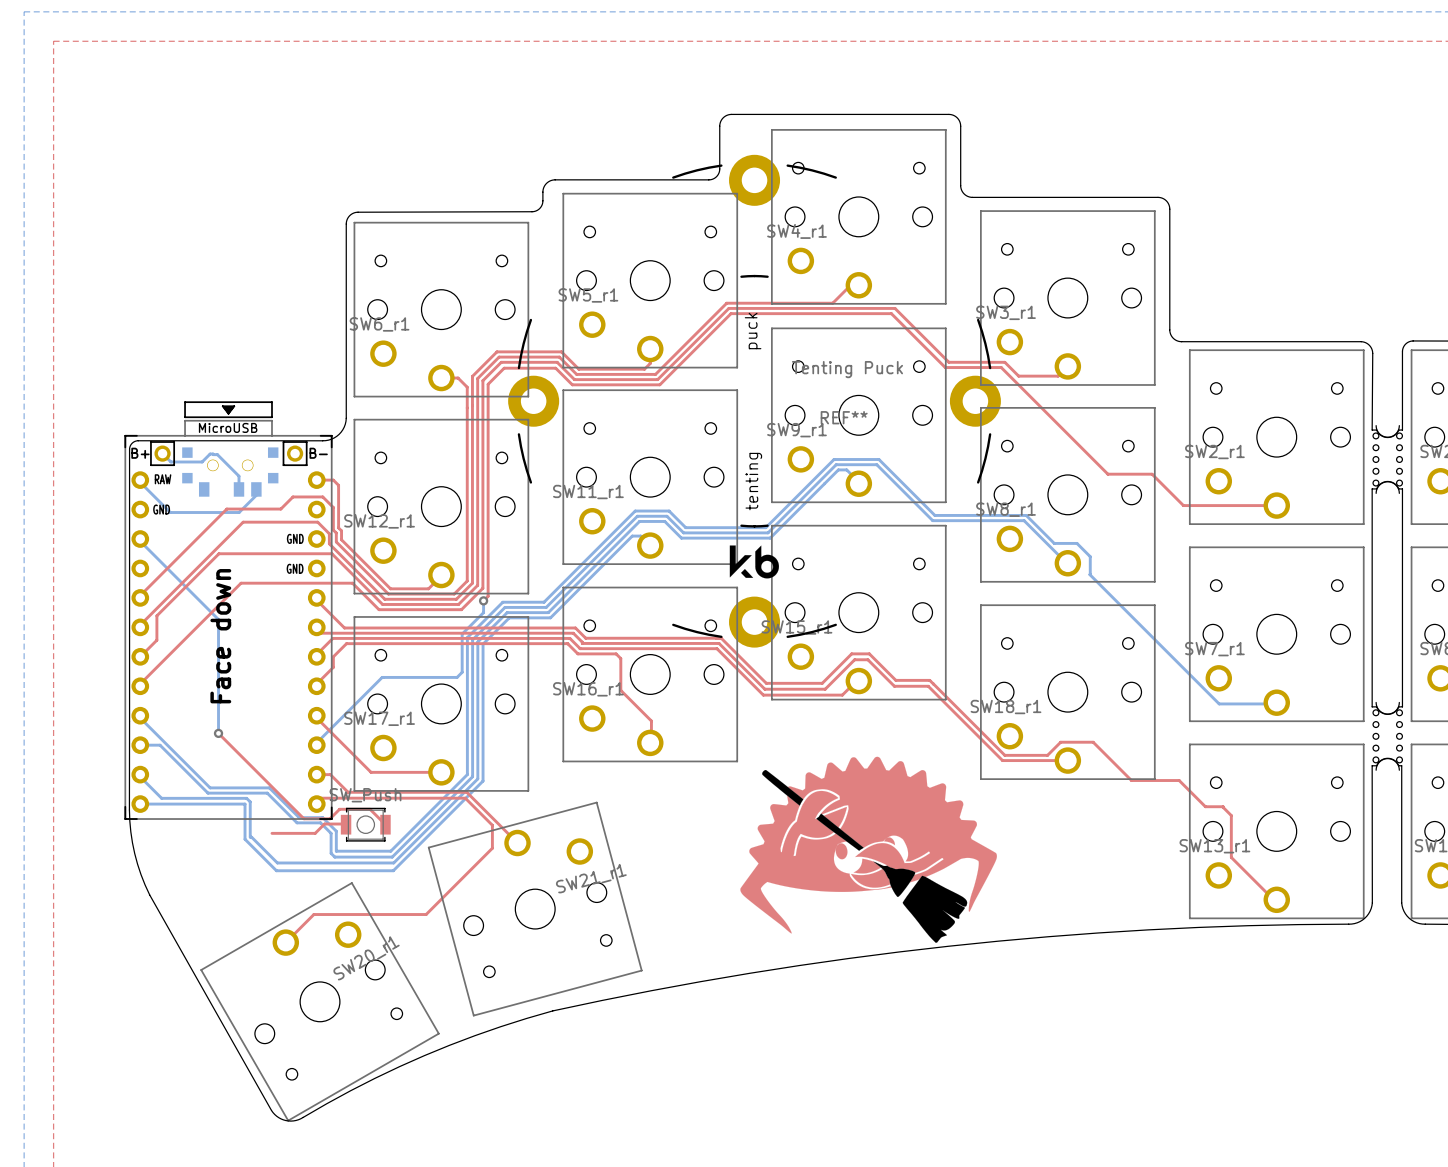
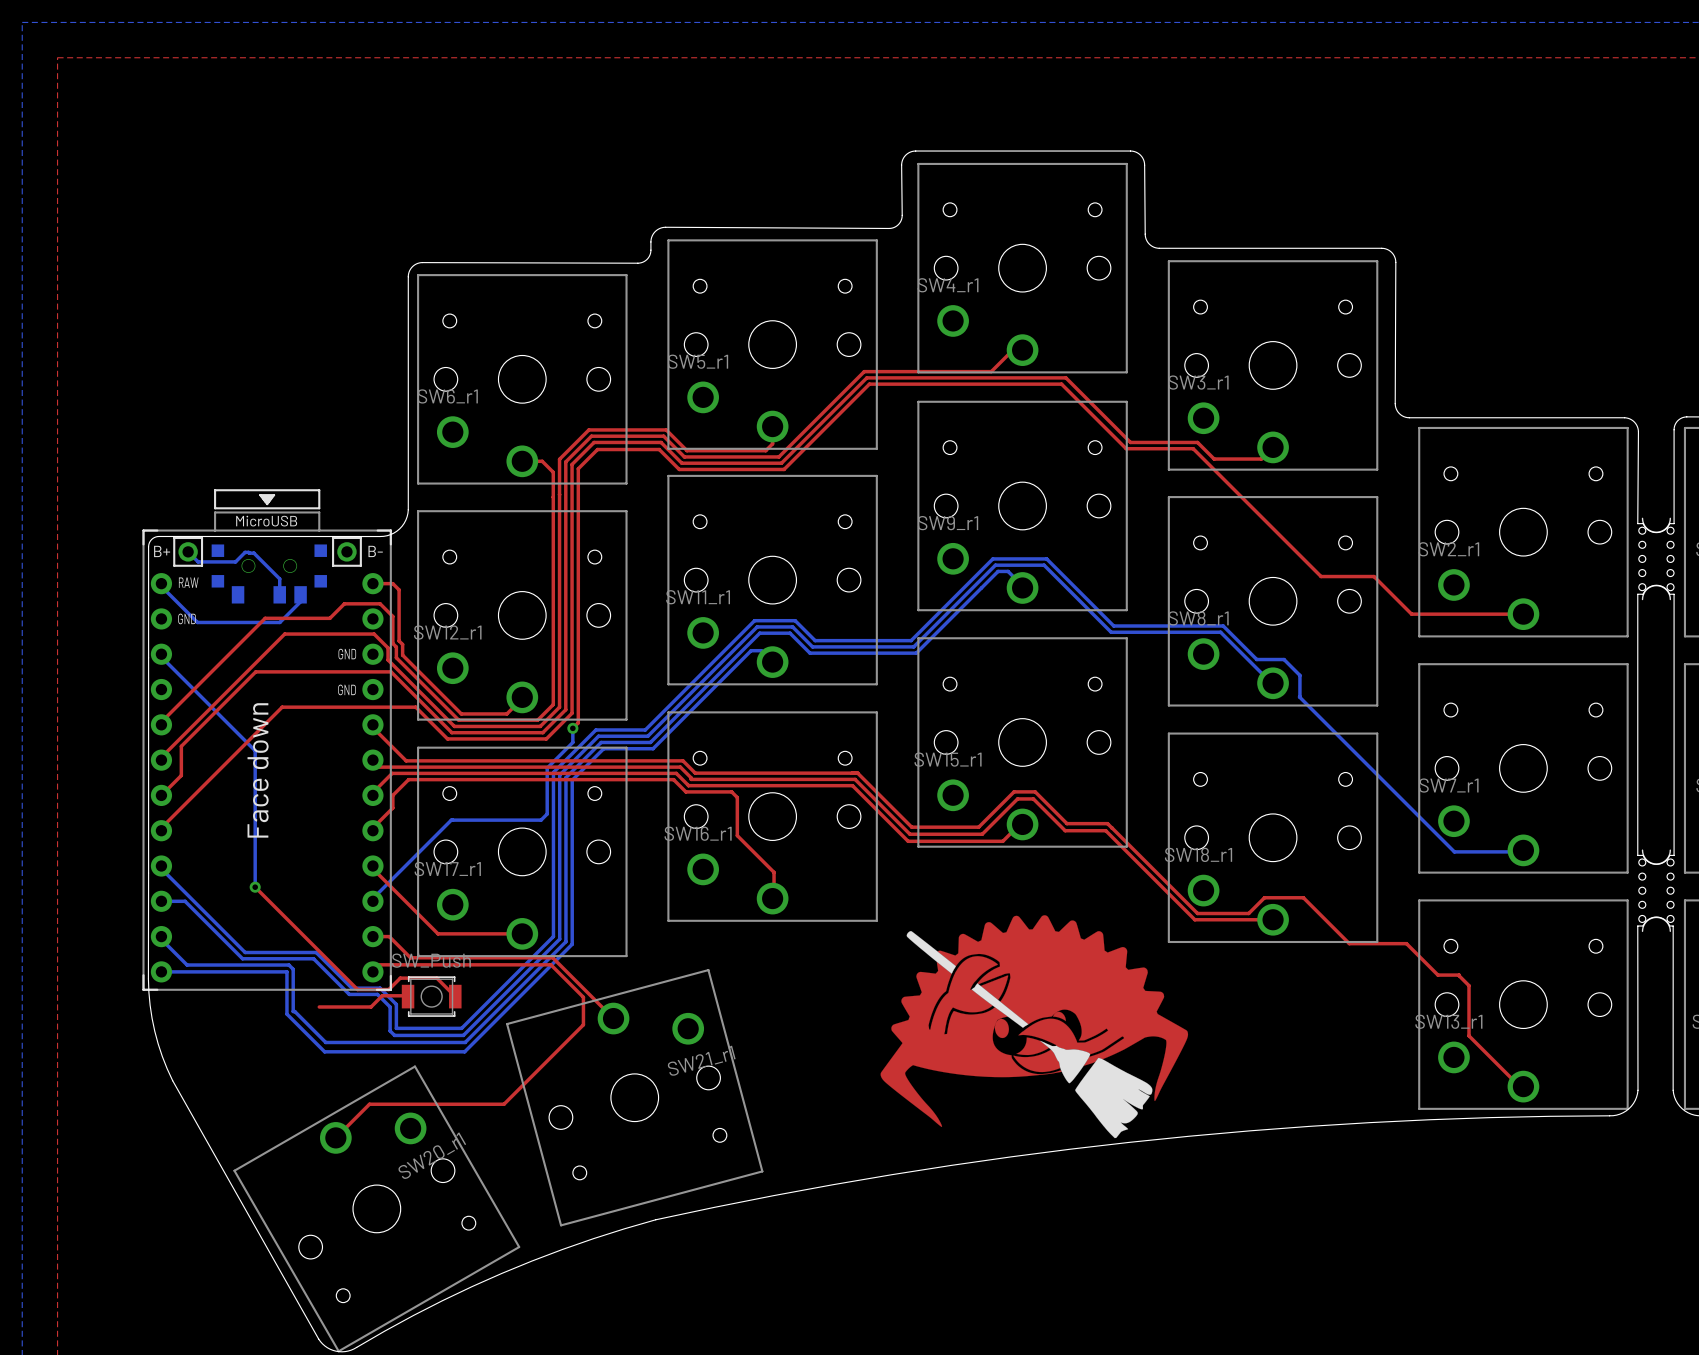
board edge: (358, 212) (533, 211) (541, 206) (544, 186) (552, 180) (711, 179) (716, 176) (719, 170) (720, 123) (723, 117) (729, 114) (950, 114) (957, 117) (960, 123) (960, 187) (963, 192) (967, 196) (1158, 197) (1166, 200) (1169, 209) (1169, 329) -> (422, 262) (639, 263) (645, 260) (649, 255) (653, 234) (663, 227) (890, 228) (897, 225) (901, 218) (901, 163) (904, 156) (912, 151) (1132, 151) (1139, 153) (1144, 161) (1145, 236) (1148, 242) (1153, 247) (1381, 248) (1391, 252) (1395, 262) (1395, 403)
REF**: Tenting Puck (754, 401) -> none

